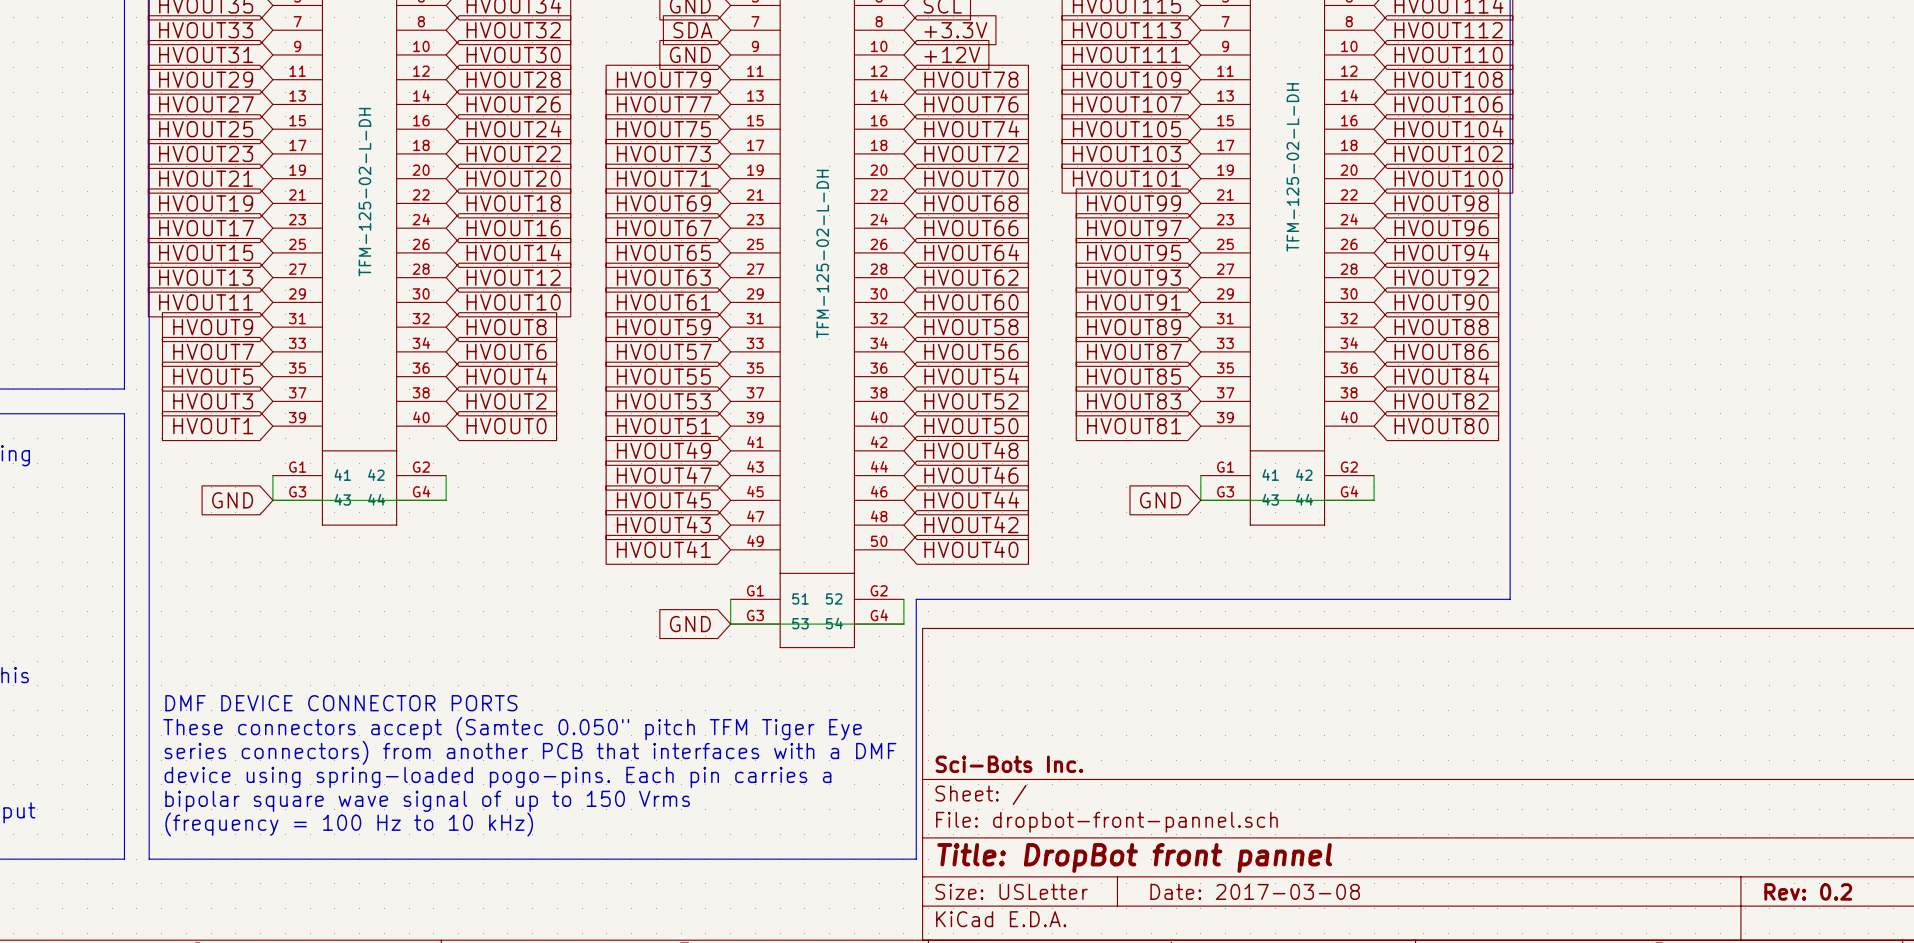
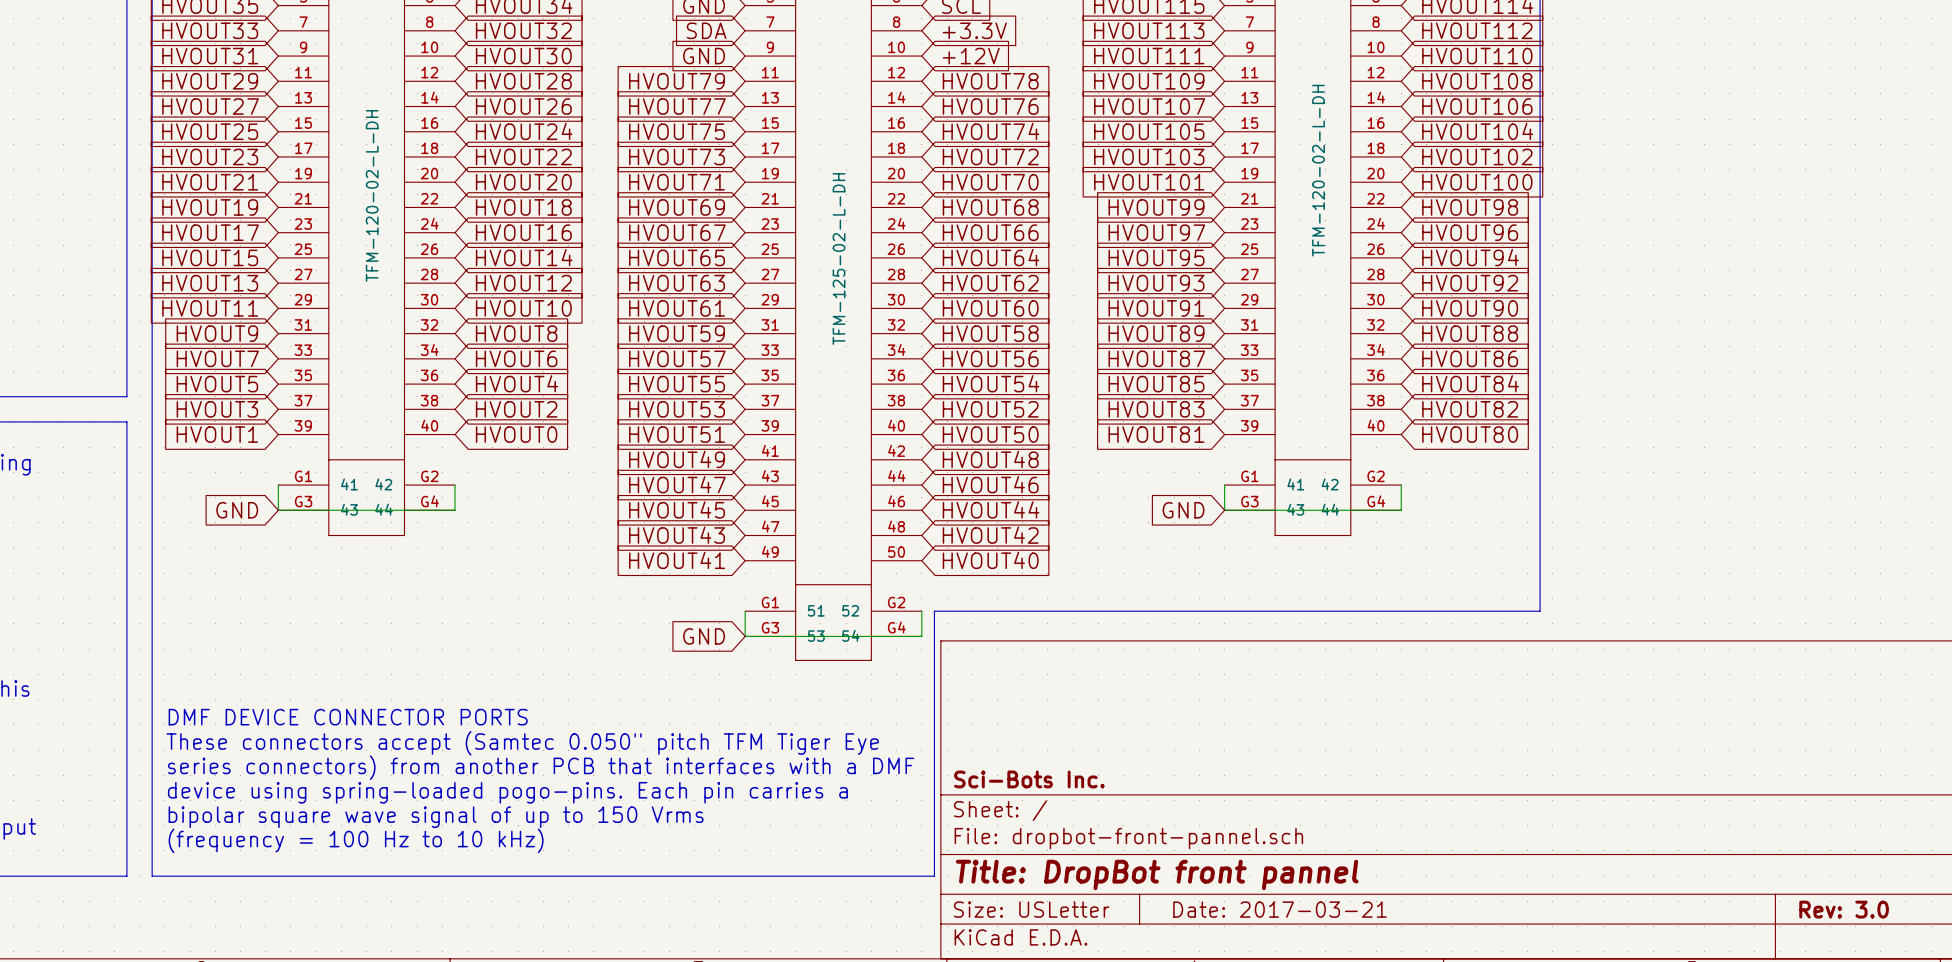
part value: TFM-125-02-L-DH (1292, 167) -> TFM-120-02-L-DH (1318, 170)
part value: TFM-125-02-L-DH (364, 192) -> TFM-120-02-L-DH (372, 195)
title block: Date: 2017-03-08 (1255, 891) -> Date: 2017-03-21 (1280, 909)
title block: Rev: 0.2 (1808, 891) -> Rev: 3.0 (1844, 909)

